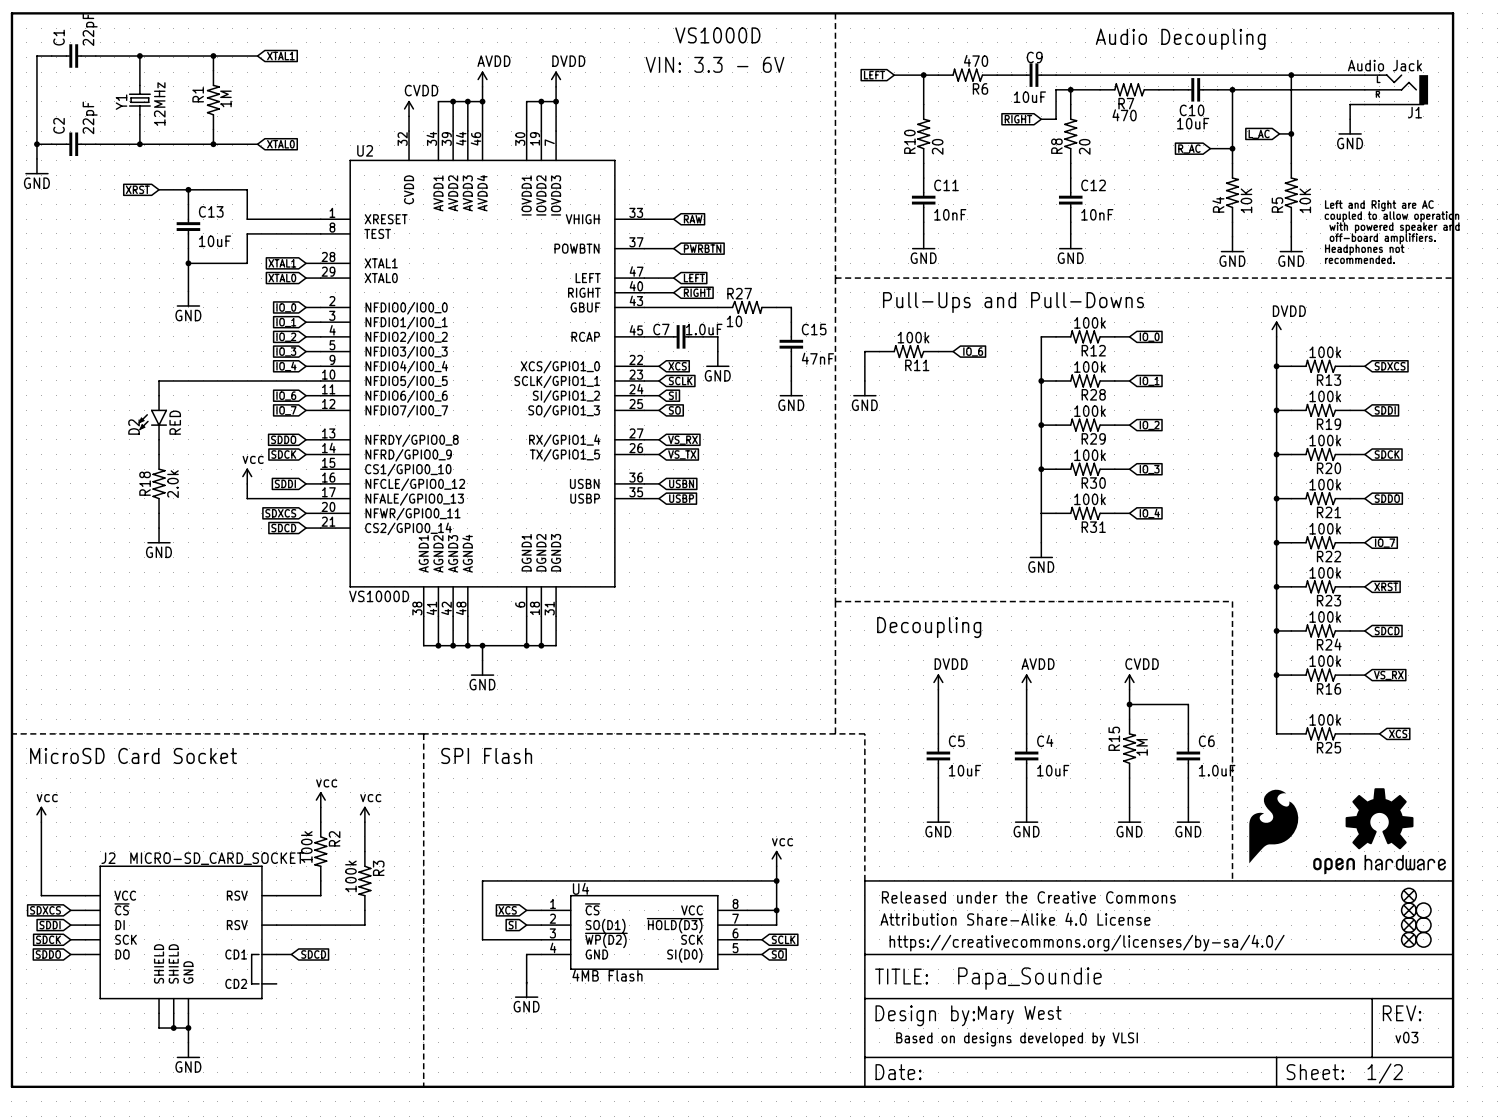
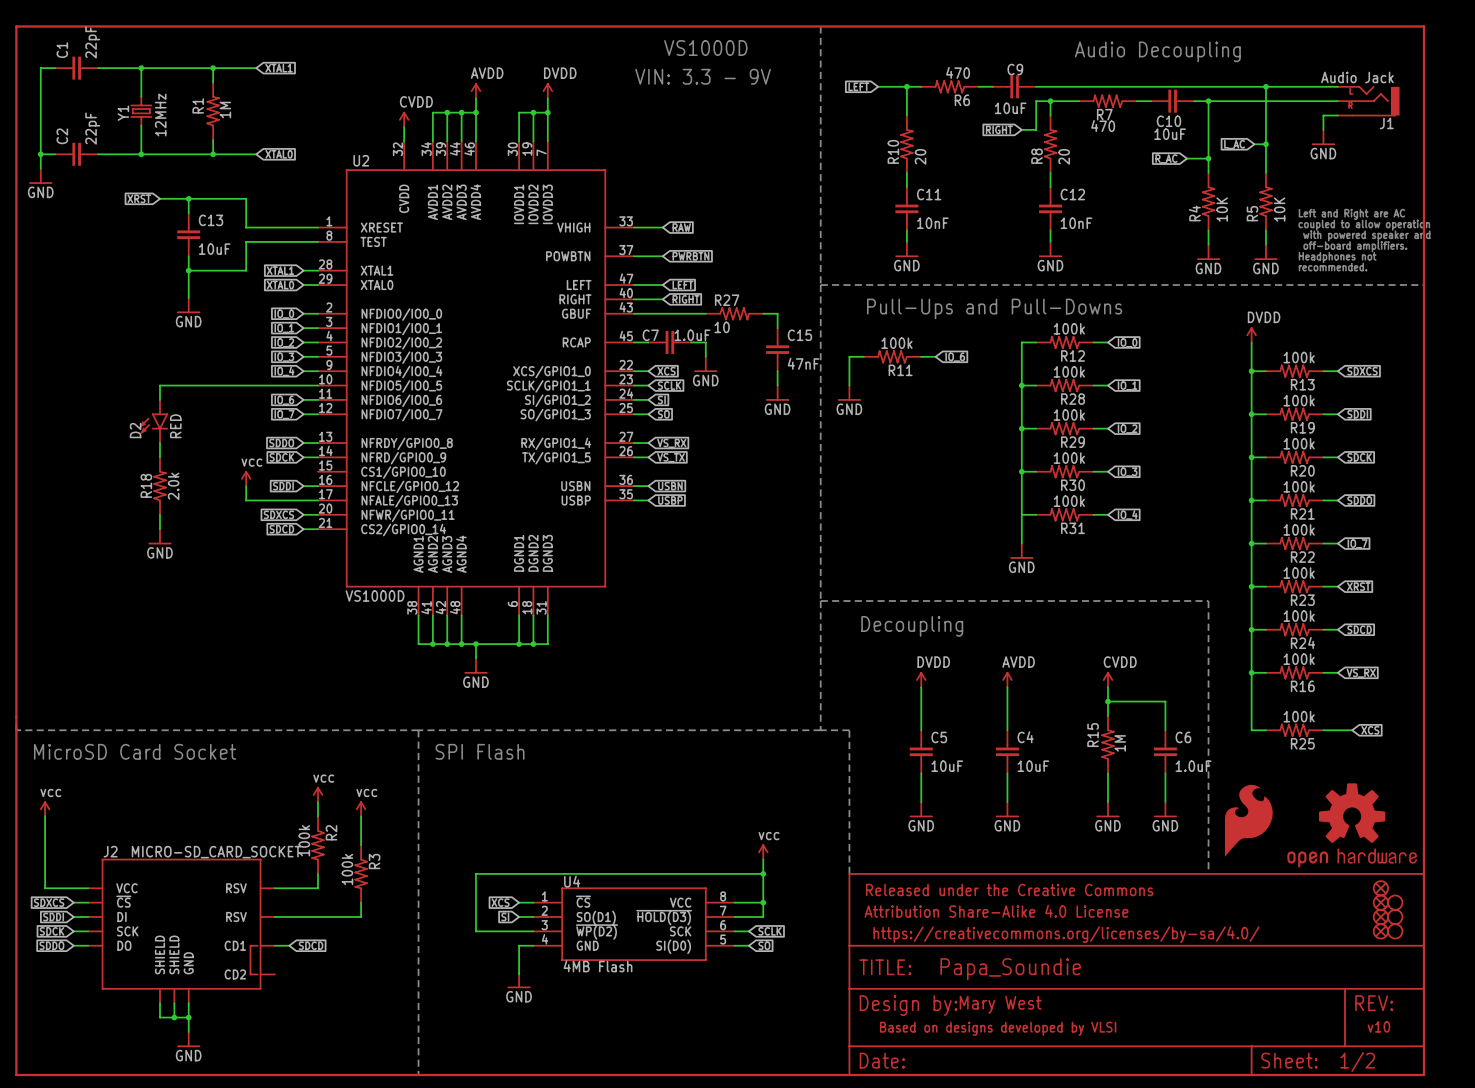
text: VIN: 3.3 - 6V (715, 64) -> VIN: 3.3 - 9V (703, 76)
text: v03 (1406, 1037) -> v10 (1378, 1026)

